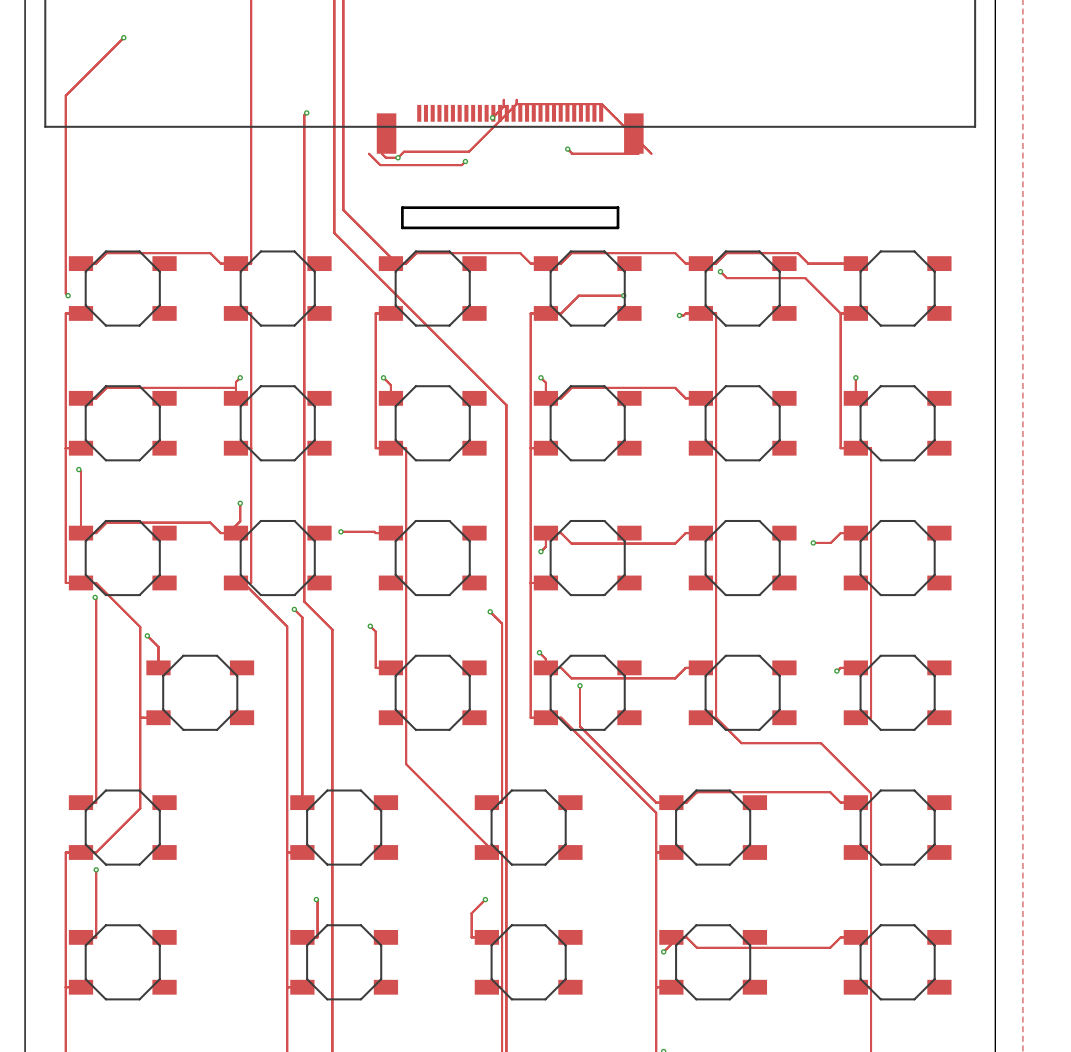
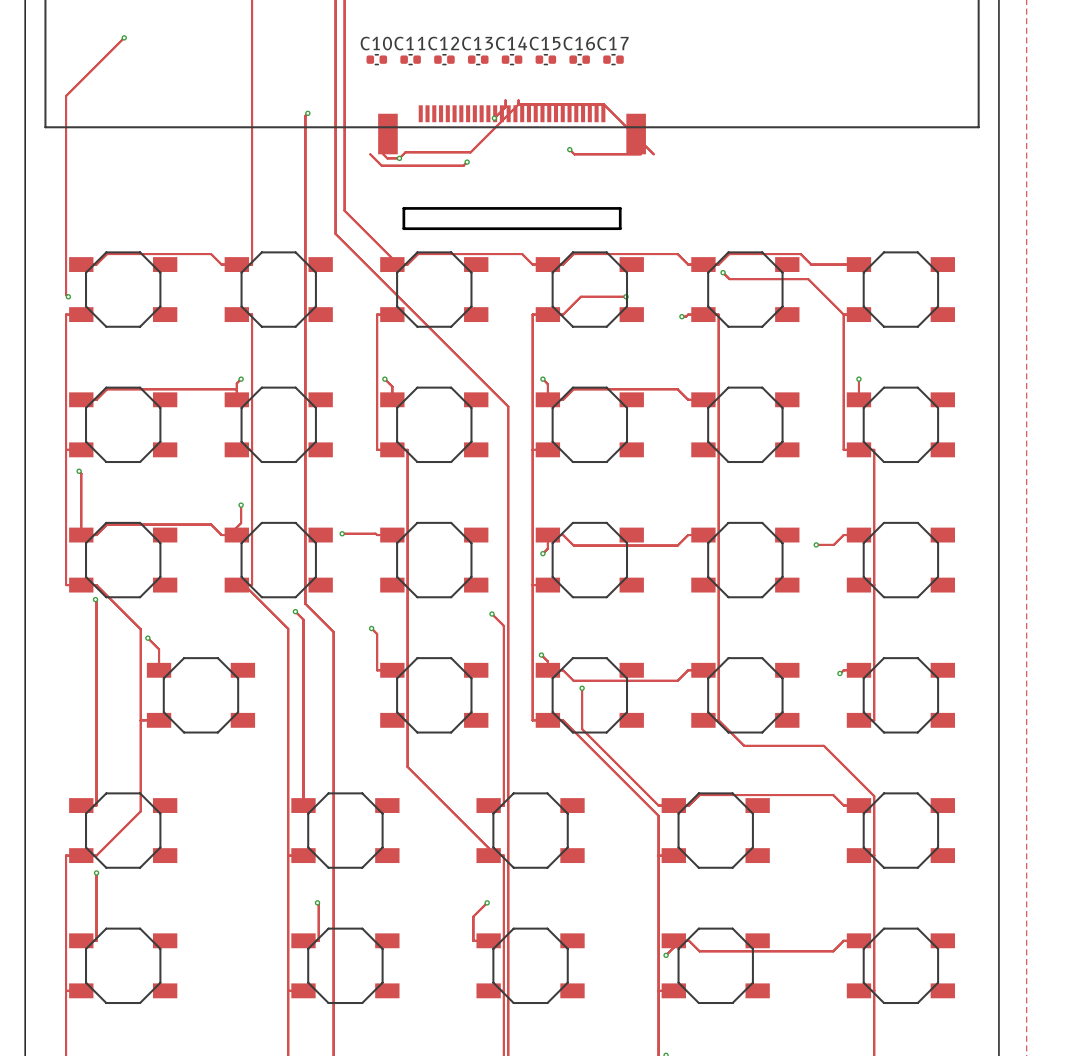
C10: none -> (376, 59)
C11: none -> (410, 59)
C12: none -> (444, 59)
C13: none -> (478, 59)
C14: none -> (512, 59)
C15: none -> (545, 59)
C16: none -> (579, 59)
C17: none -> (613, 59)

